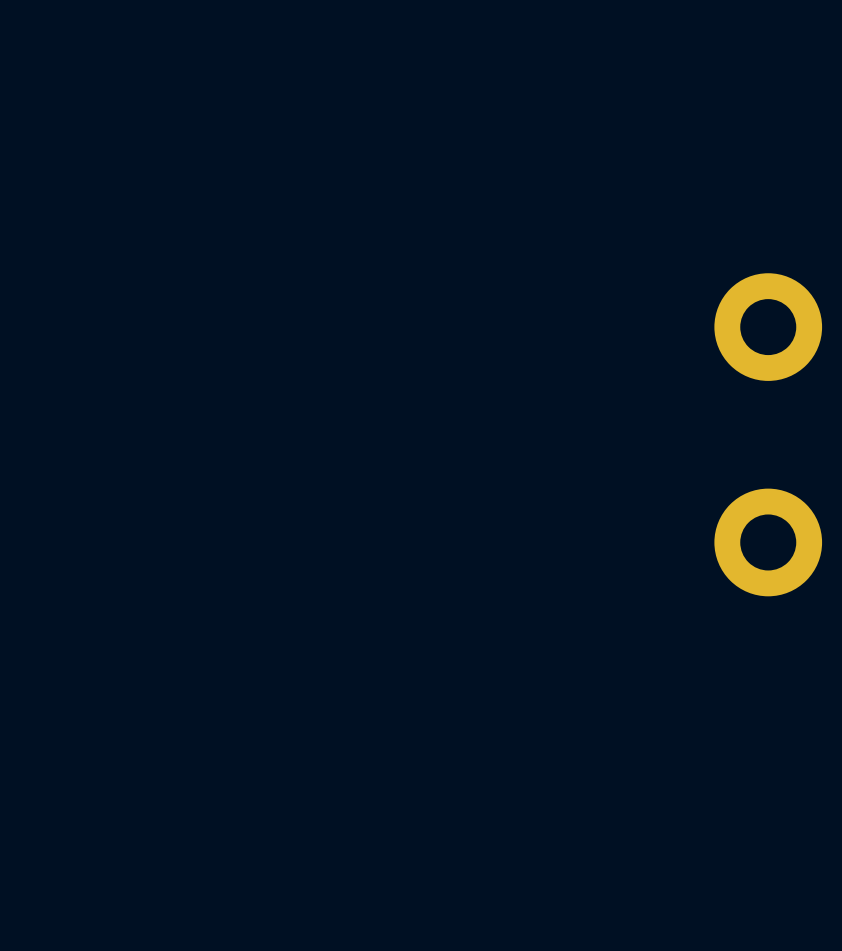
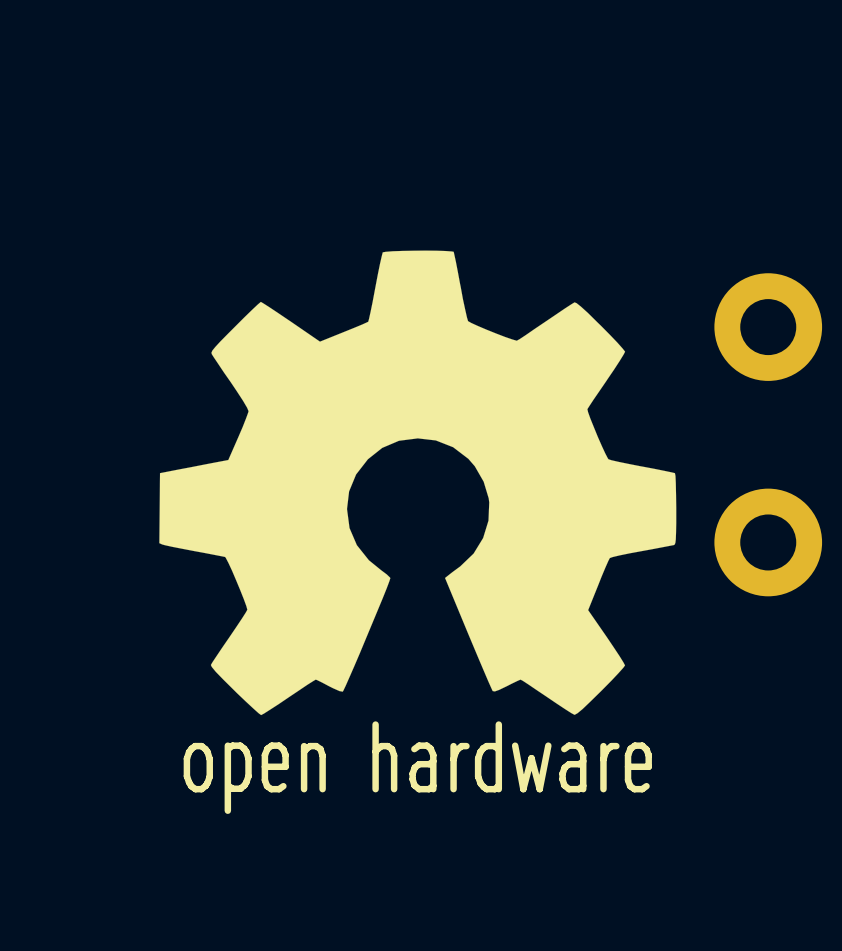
drawing: none -> [159, 250, 677, 814]

